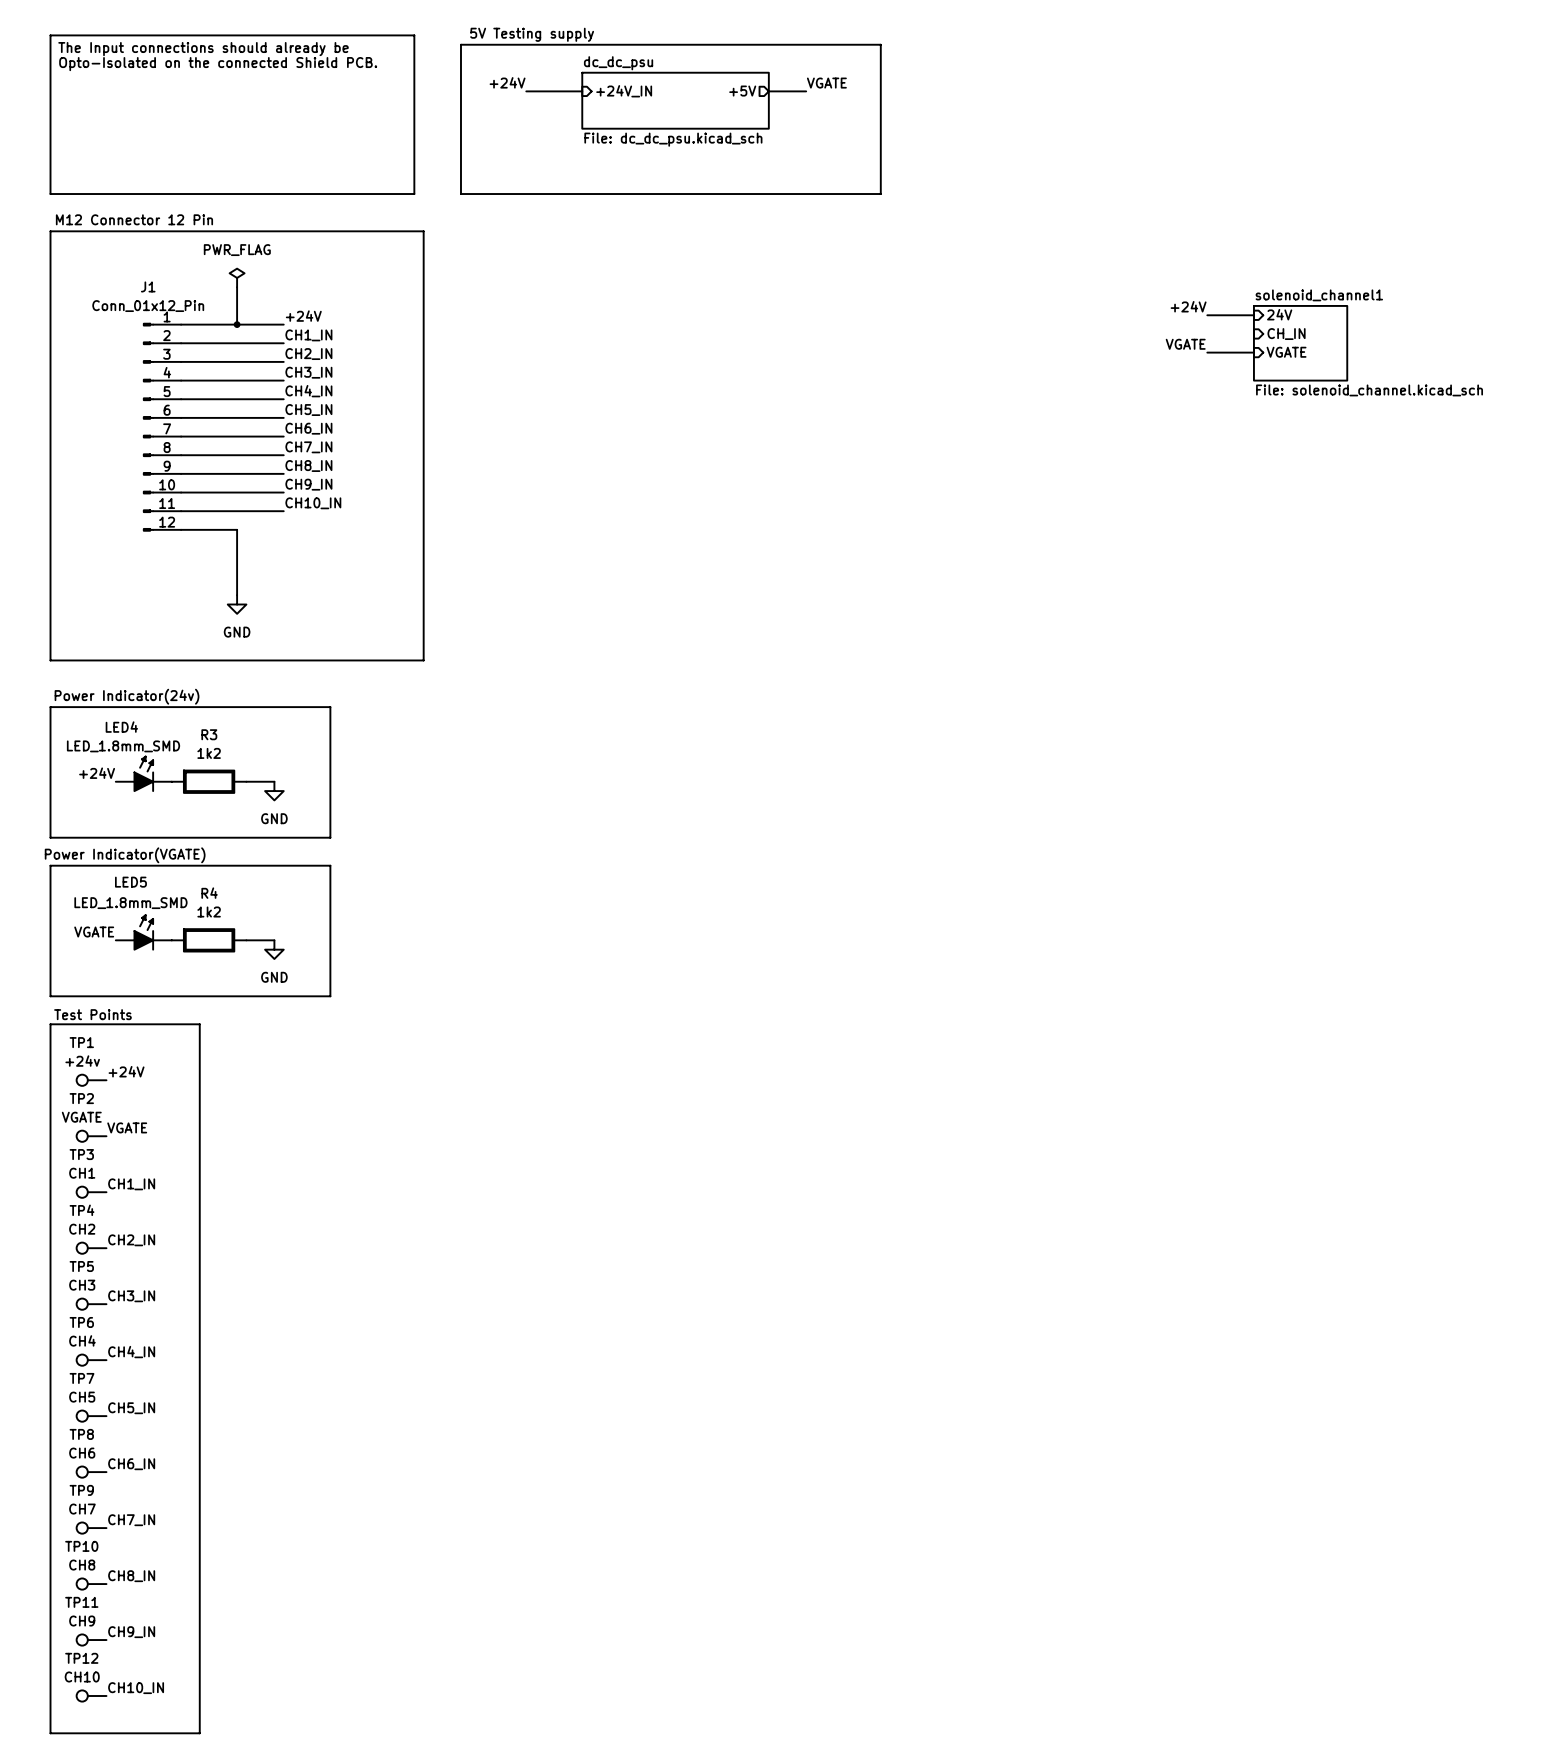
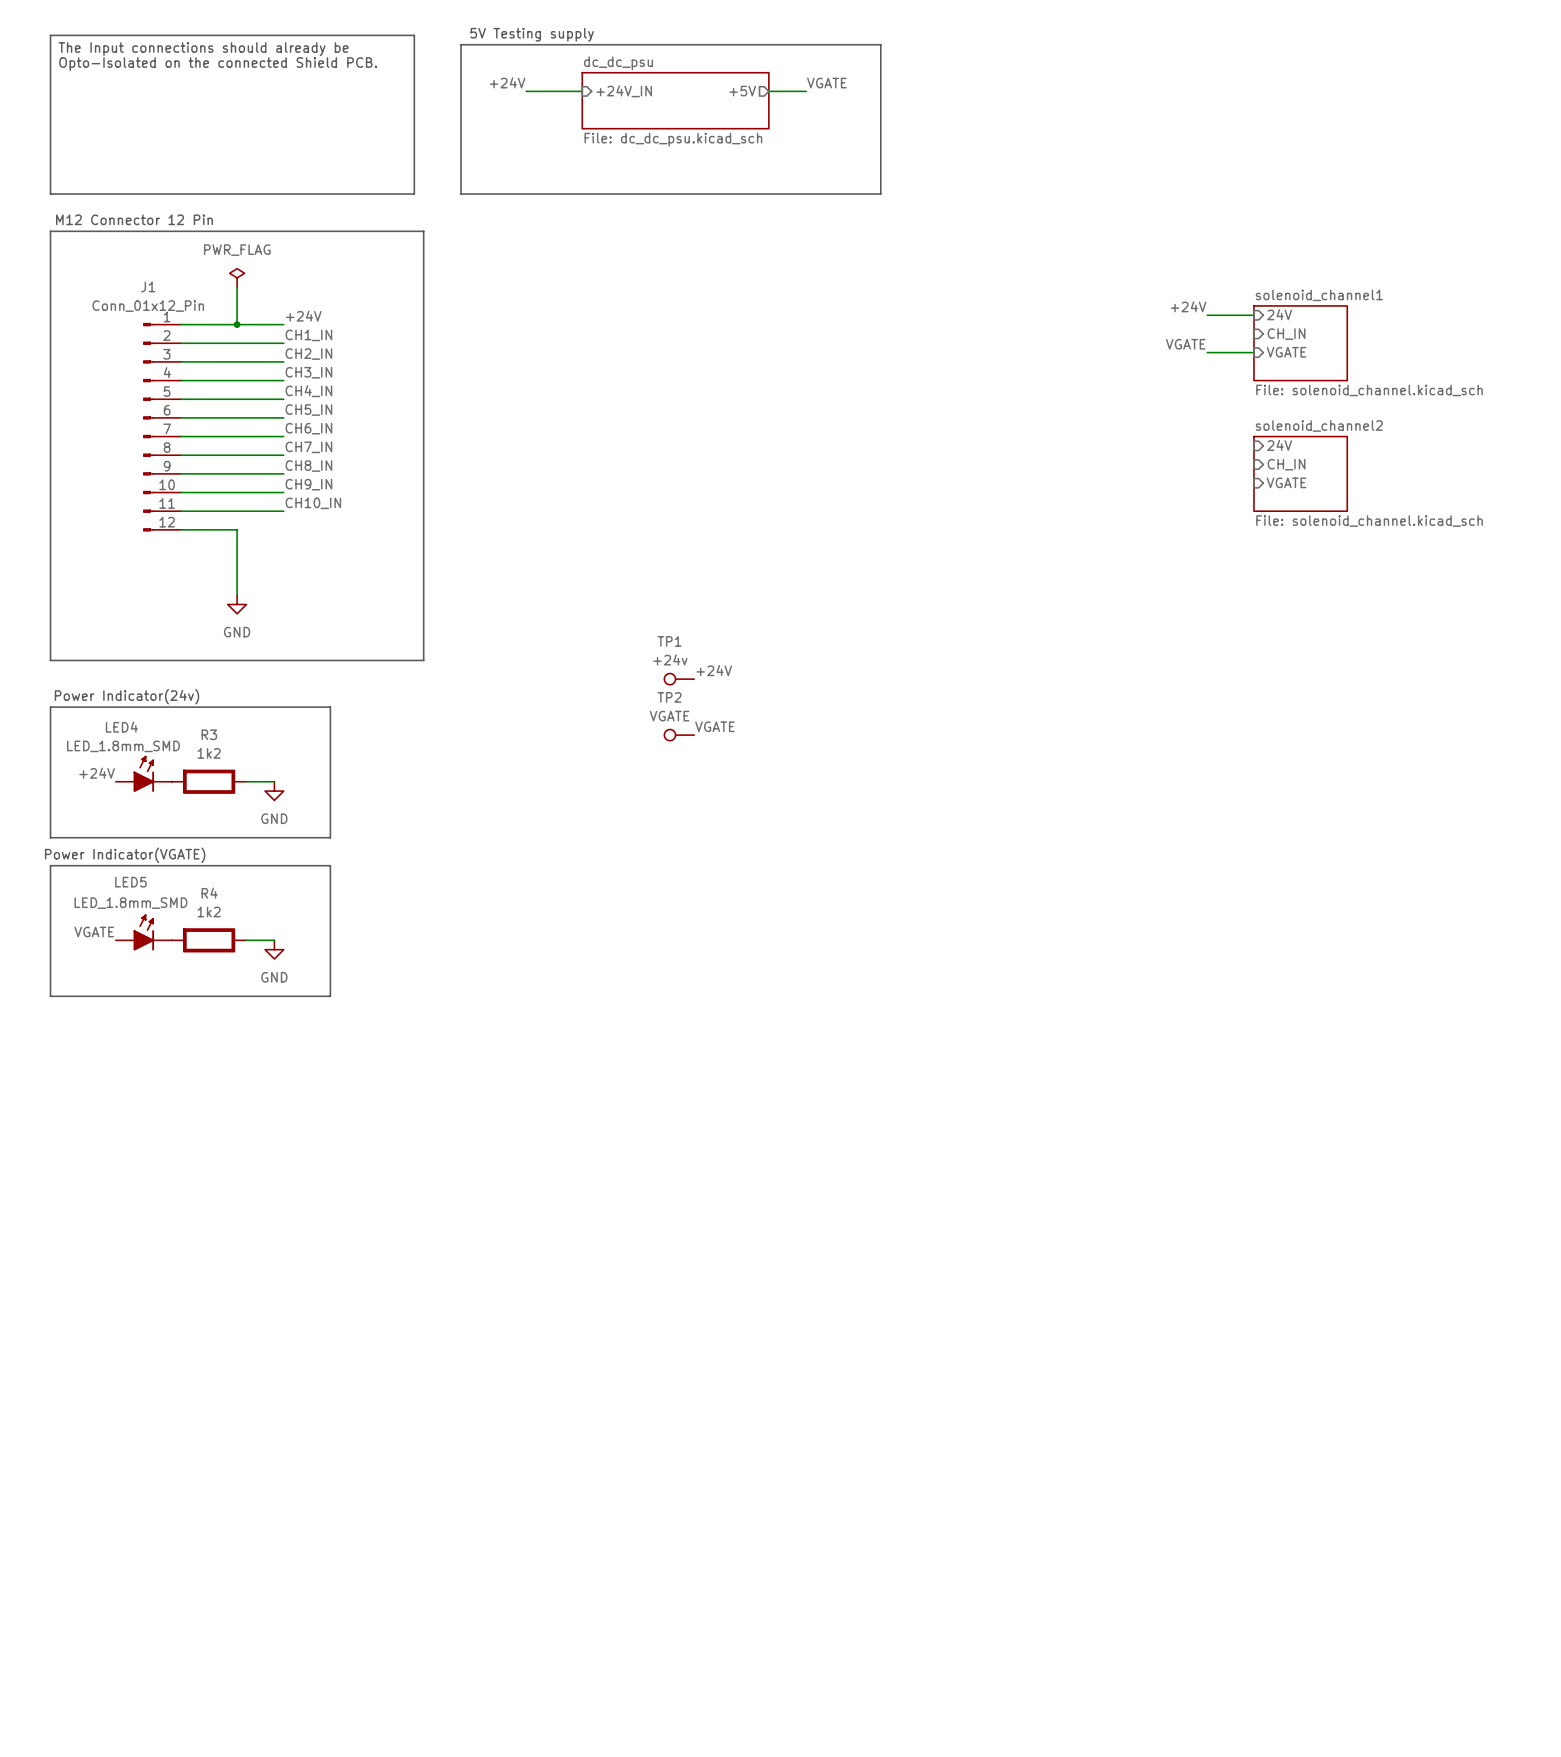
sheet pin: none -> 24V (1279, 445)
sheet pin: none -> CH_IN (1286, 464)
sheet solenoid_channel2: none -> File: solenoid_channel.kicad_sch (1300, 473)
sheet pin: none -> VGATE (1286, 482)
label: none -> +24V (714, 670)
label: none -> VGATE (714, 726)
text: Test Points (92, 1014) -> none
line: (50, 1024) (199, 1024) (199, 1733) (50, 1733) (50, 1024) -> none
label: +24V (126, 1071) -> none
TP1 position: (91, 1080) -> (679, 679)
label: VGATE (127, 1127) -> none
TP2 position: (91, 1136) -> (679, 735)
label: CH1_IN (131, 1184) -> none
TP3: CH1 (91, 1192) -> none
label: CH2_IN (131, 1240) -> none
TP4: CH2 (91, 1248) -> none
label: CH3_IN (131, 1296) -> none
TP5: CH3 (91, 1304) -> none
label: CH4_IN (131, 1352) -> none
TP6: CH4 (91, 1360) -> none
label: CH5_IN (131, 1408) -> none
TP7: CH5 (91, 1416) -> none
label: CH6_IN (131, 1464) -> none
TP8: CH6 (91, 1472) -> none
label: CH7_IN (131, 1520) -> none
TP9: CH7 (91, 1528) -> none
label: CH8_IN (131, 1576) -> none
TP10: CH8 (91, 1584) -> none
label: CH9_IN (131, 1632) -> none
TP11: CH9 (91, 1640) -> none
label: CH10_IN (136, 1688) -> none
TP12: CH10 (91, 1695) -> none

